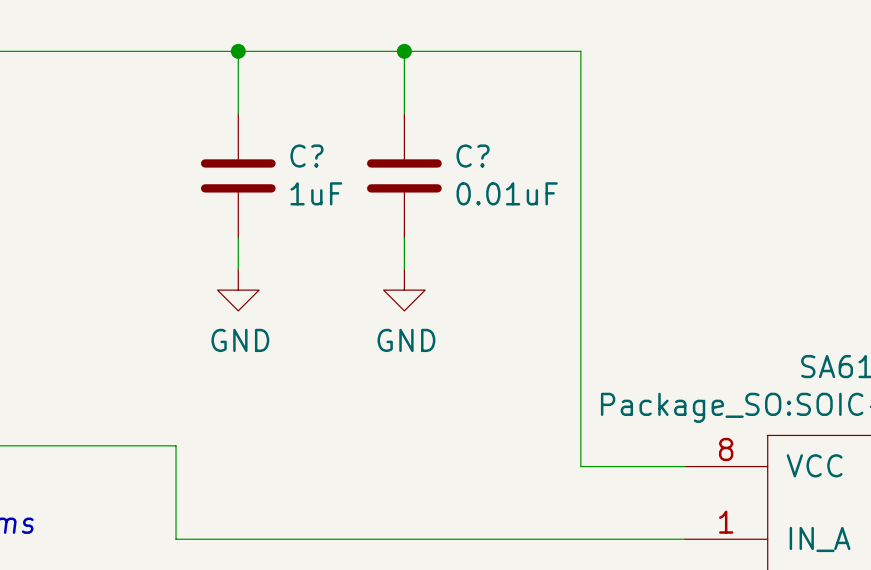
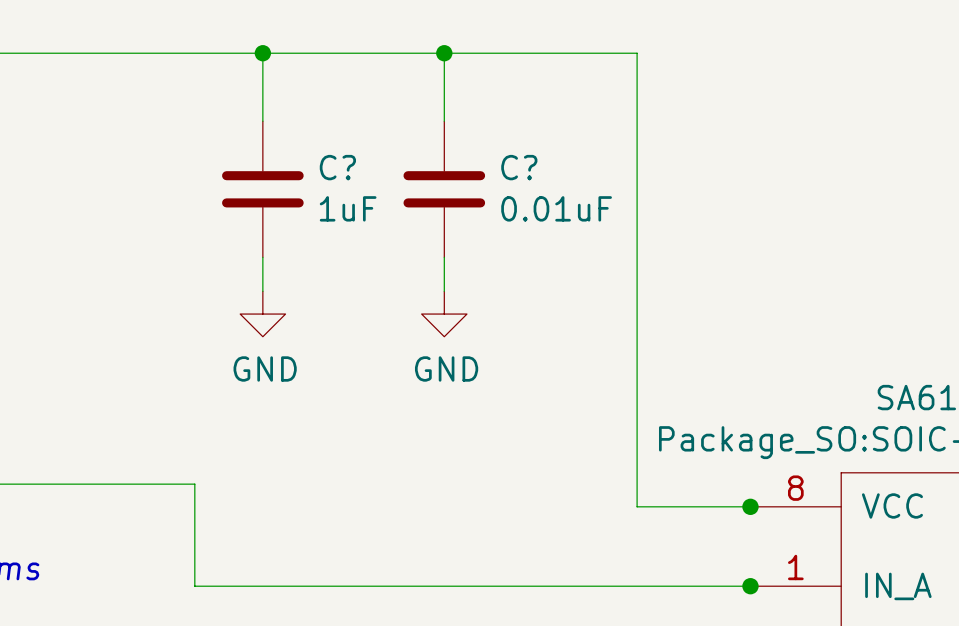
junction: none -> (750, 506)
junction: none -> (750, 586)

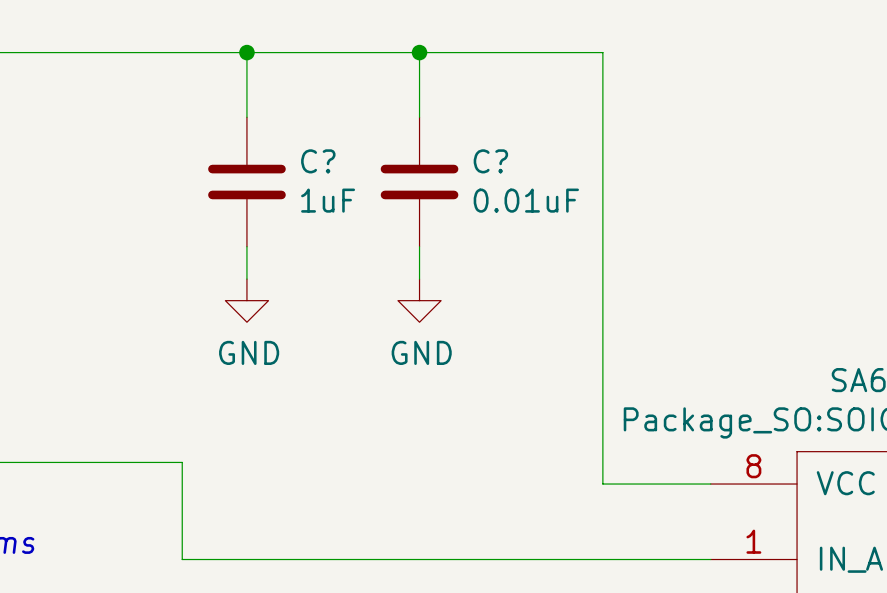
junction: (750, 506) -> none
junction: (750, 586) -> none

